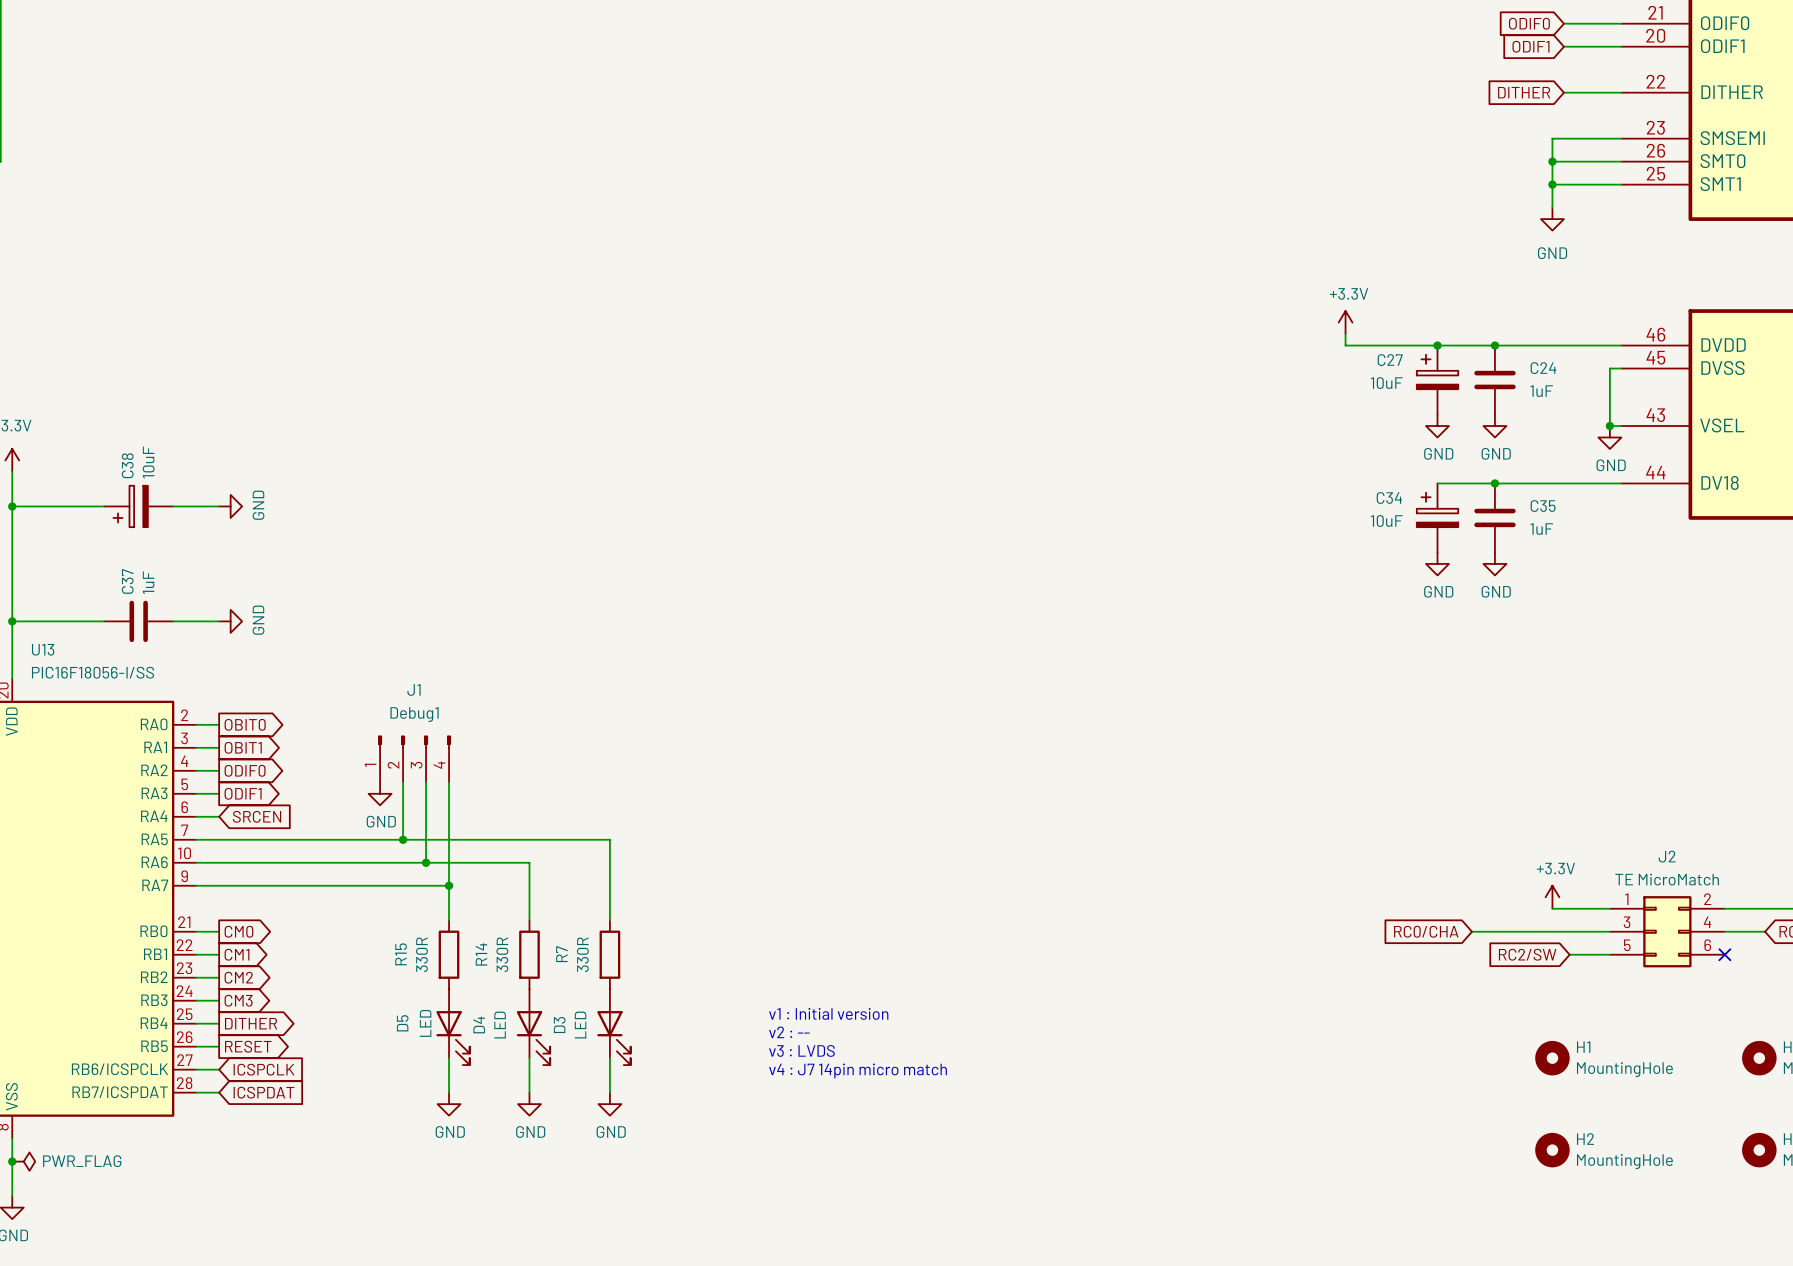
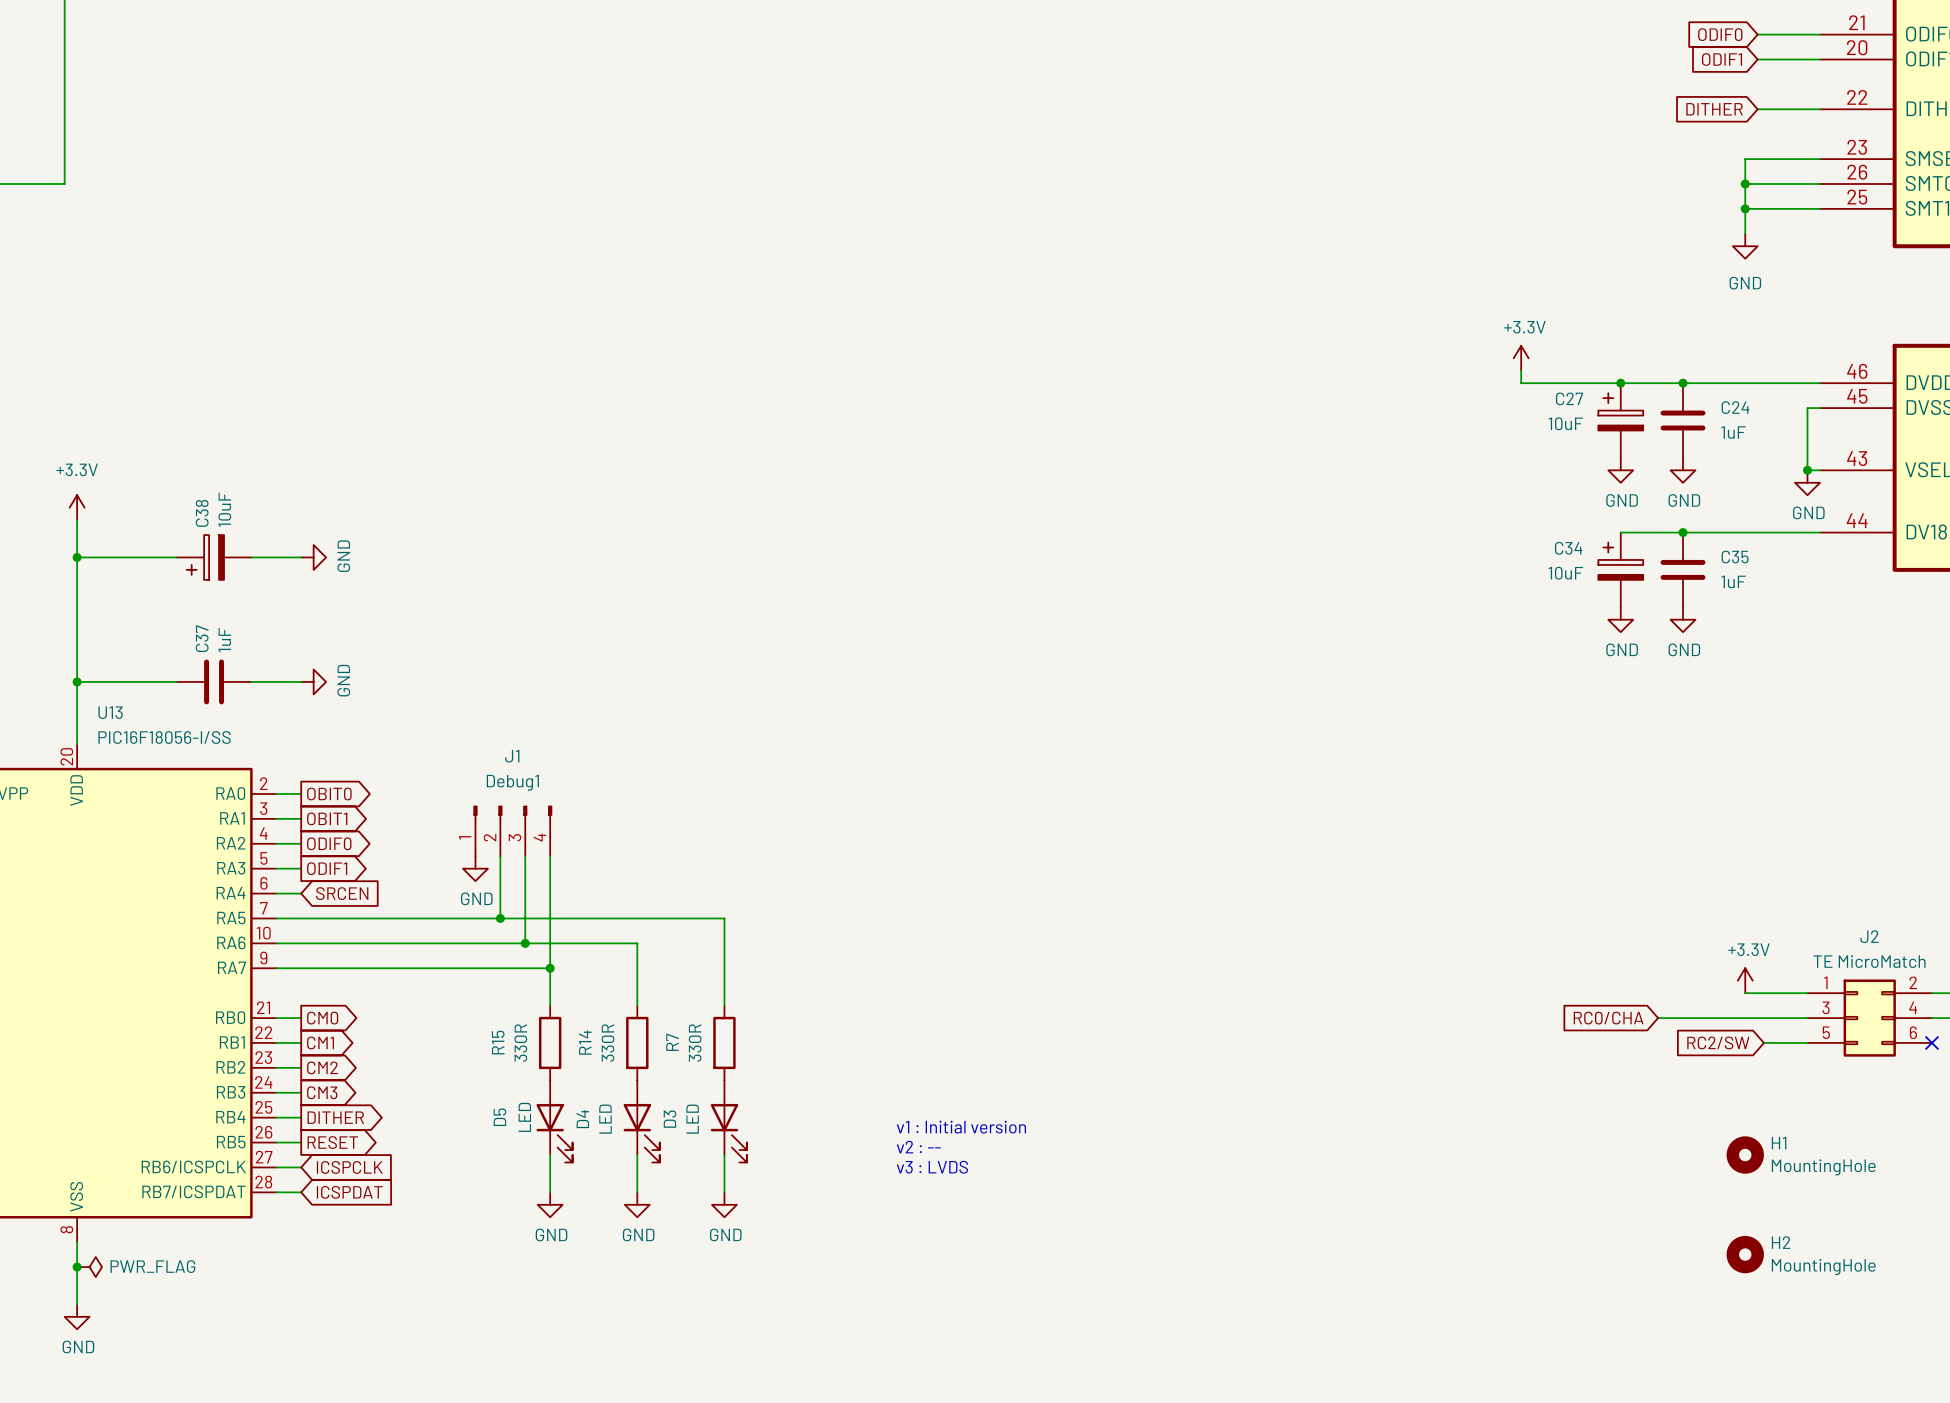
text: v1 : Initial version (828, 1013) -> none
text: v2 : -- (789, 1032) -> v1 : Initial version (961, 1127)
text: v3 : LVDS (801, 1050) -> v2 : -- (918, 1147)
text: v4 : J7 14pin micro match (857, 1070) -> v3 : LVDS (932, 1167)

